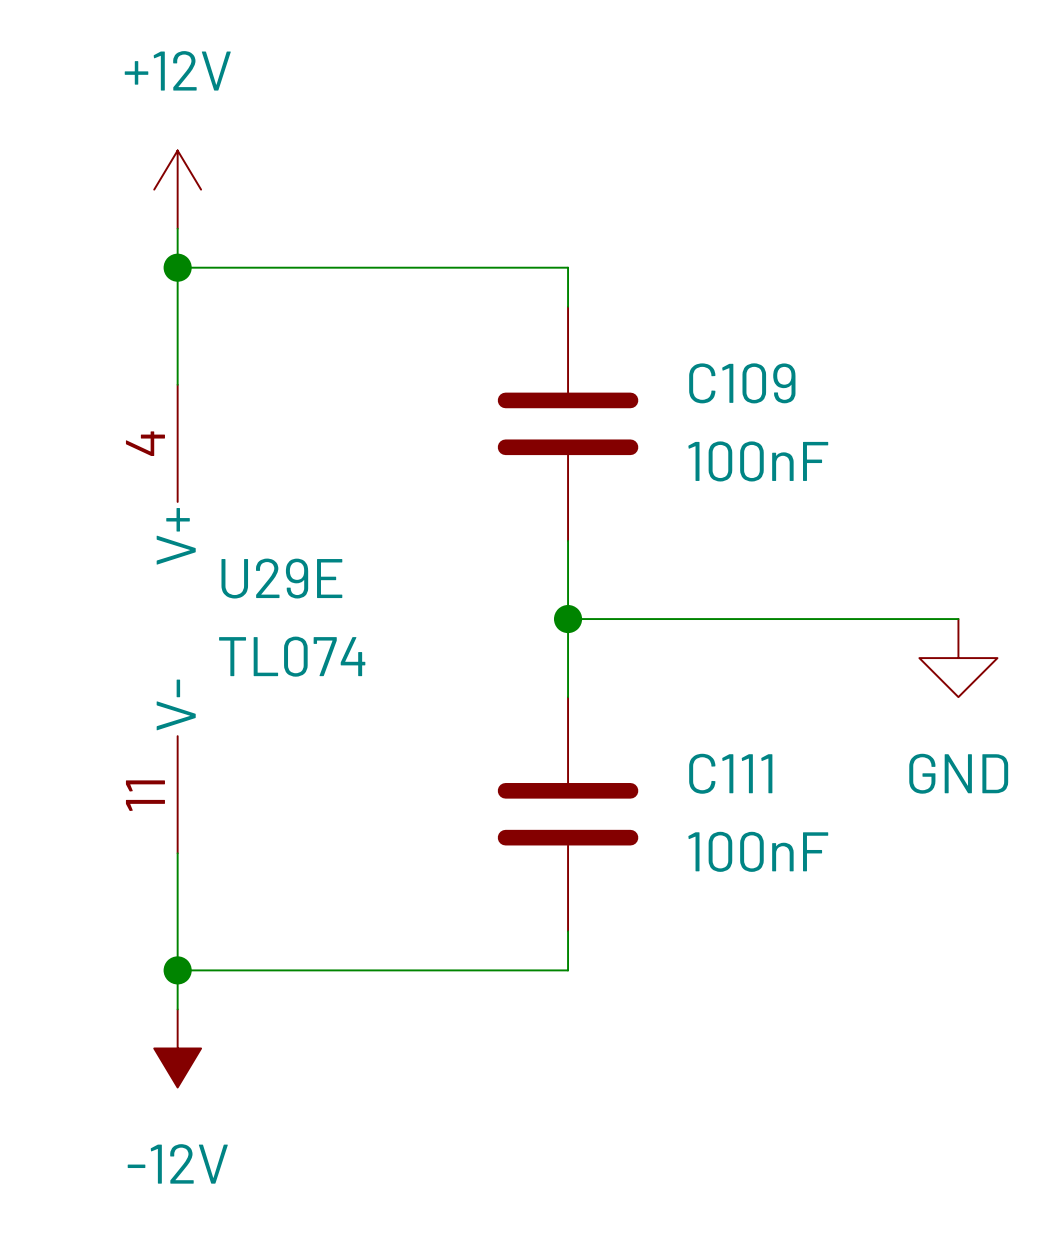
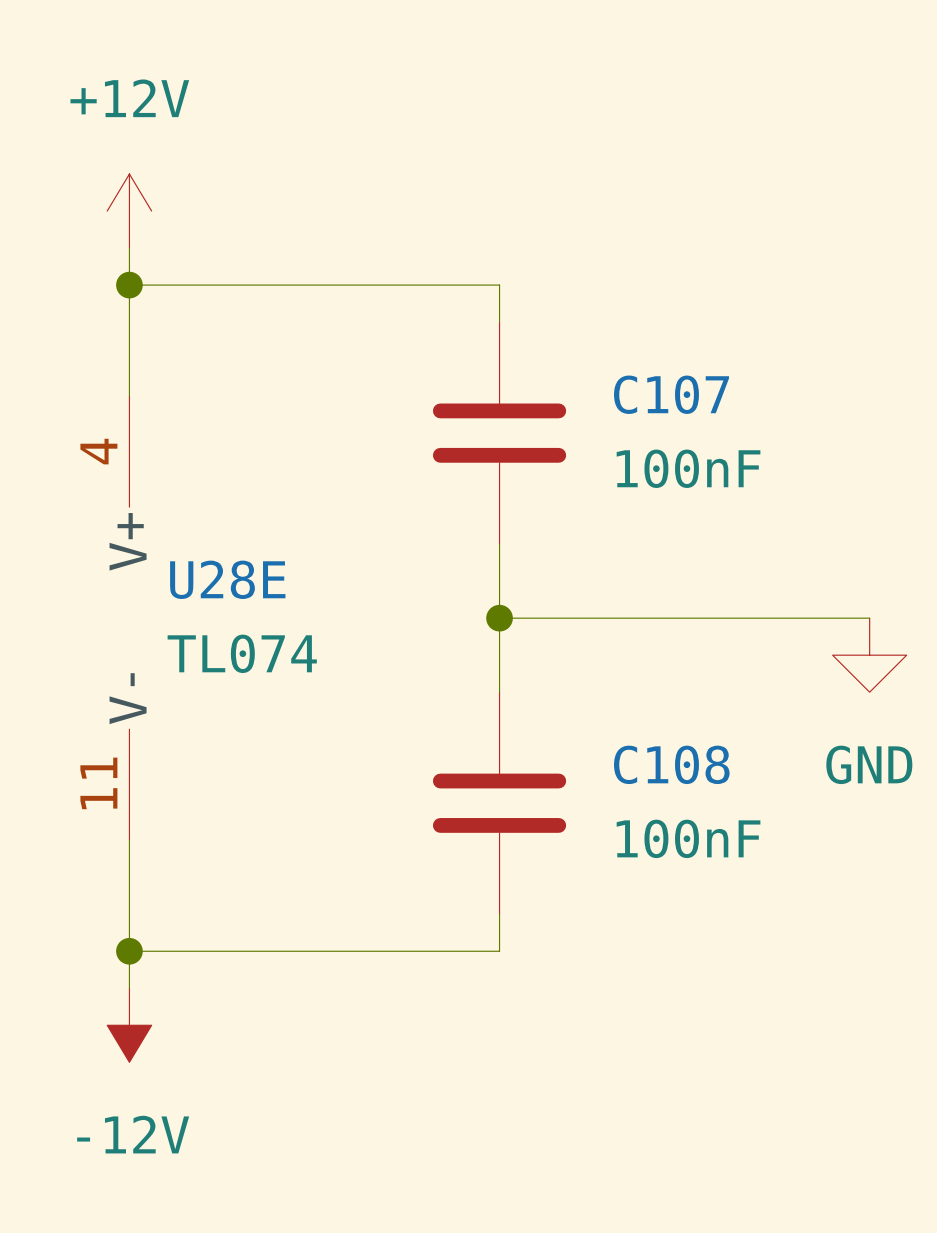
C109 name: C109 (742, 383) -> C107 (671, 394)
U29E name: U29E (281, 578) -> U28E (227, 579)
C111 name: C111 (730, 773) -> C108 (671, 764)

